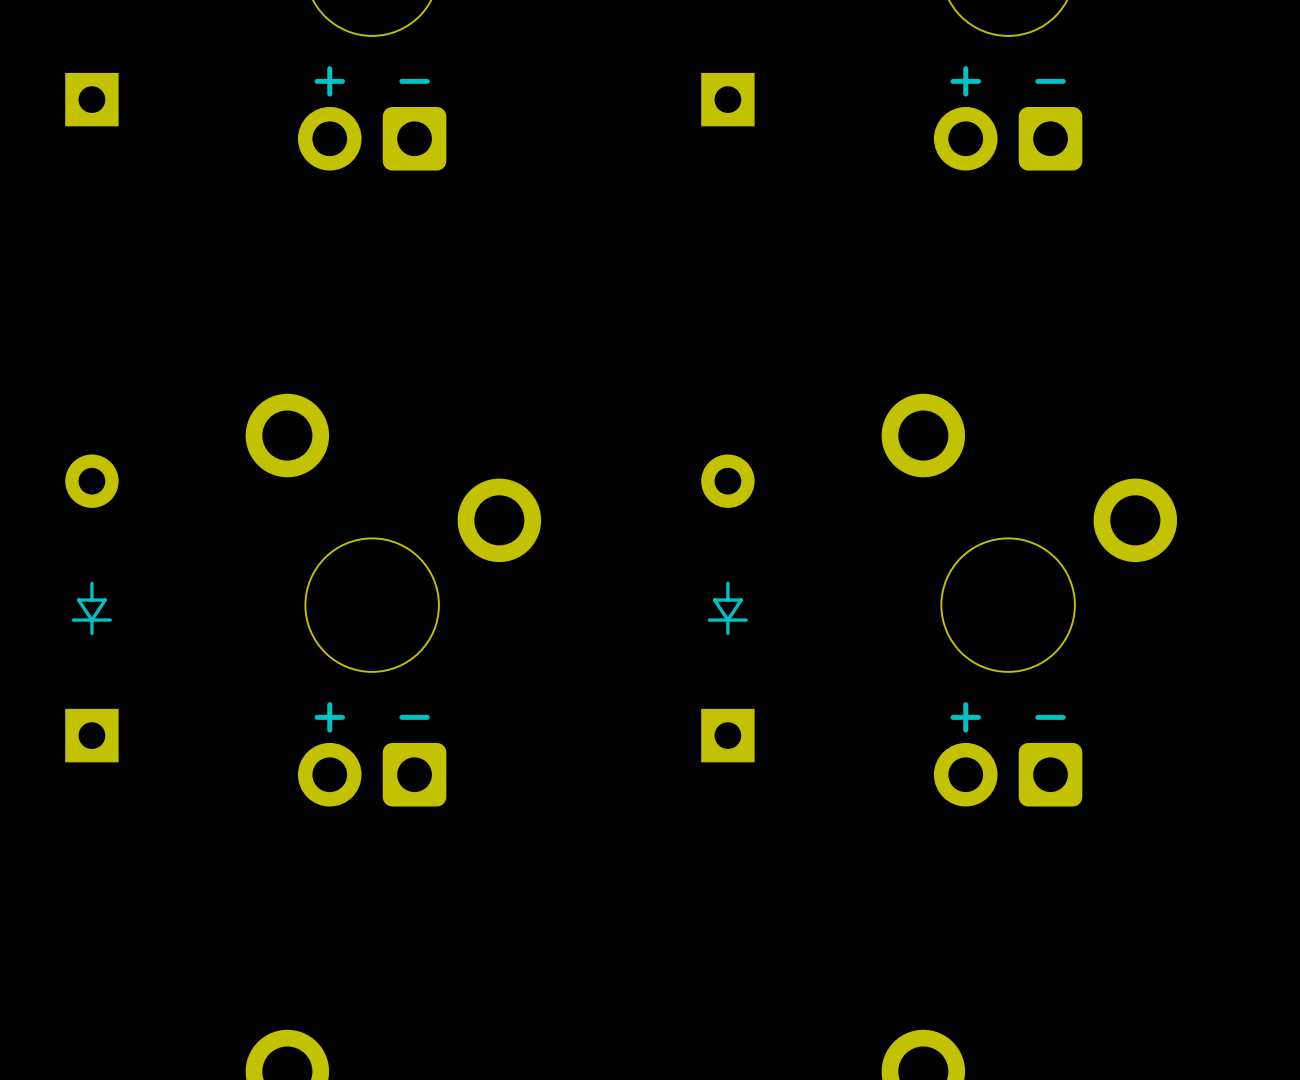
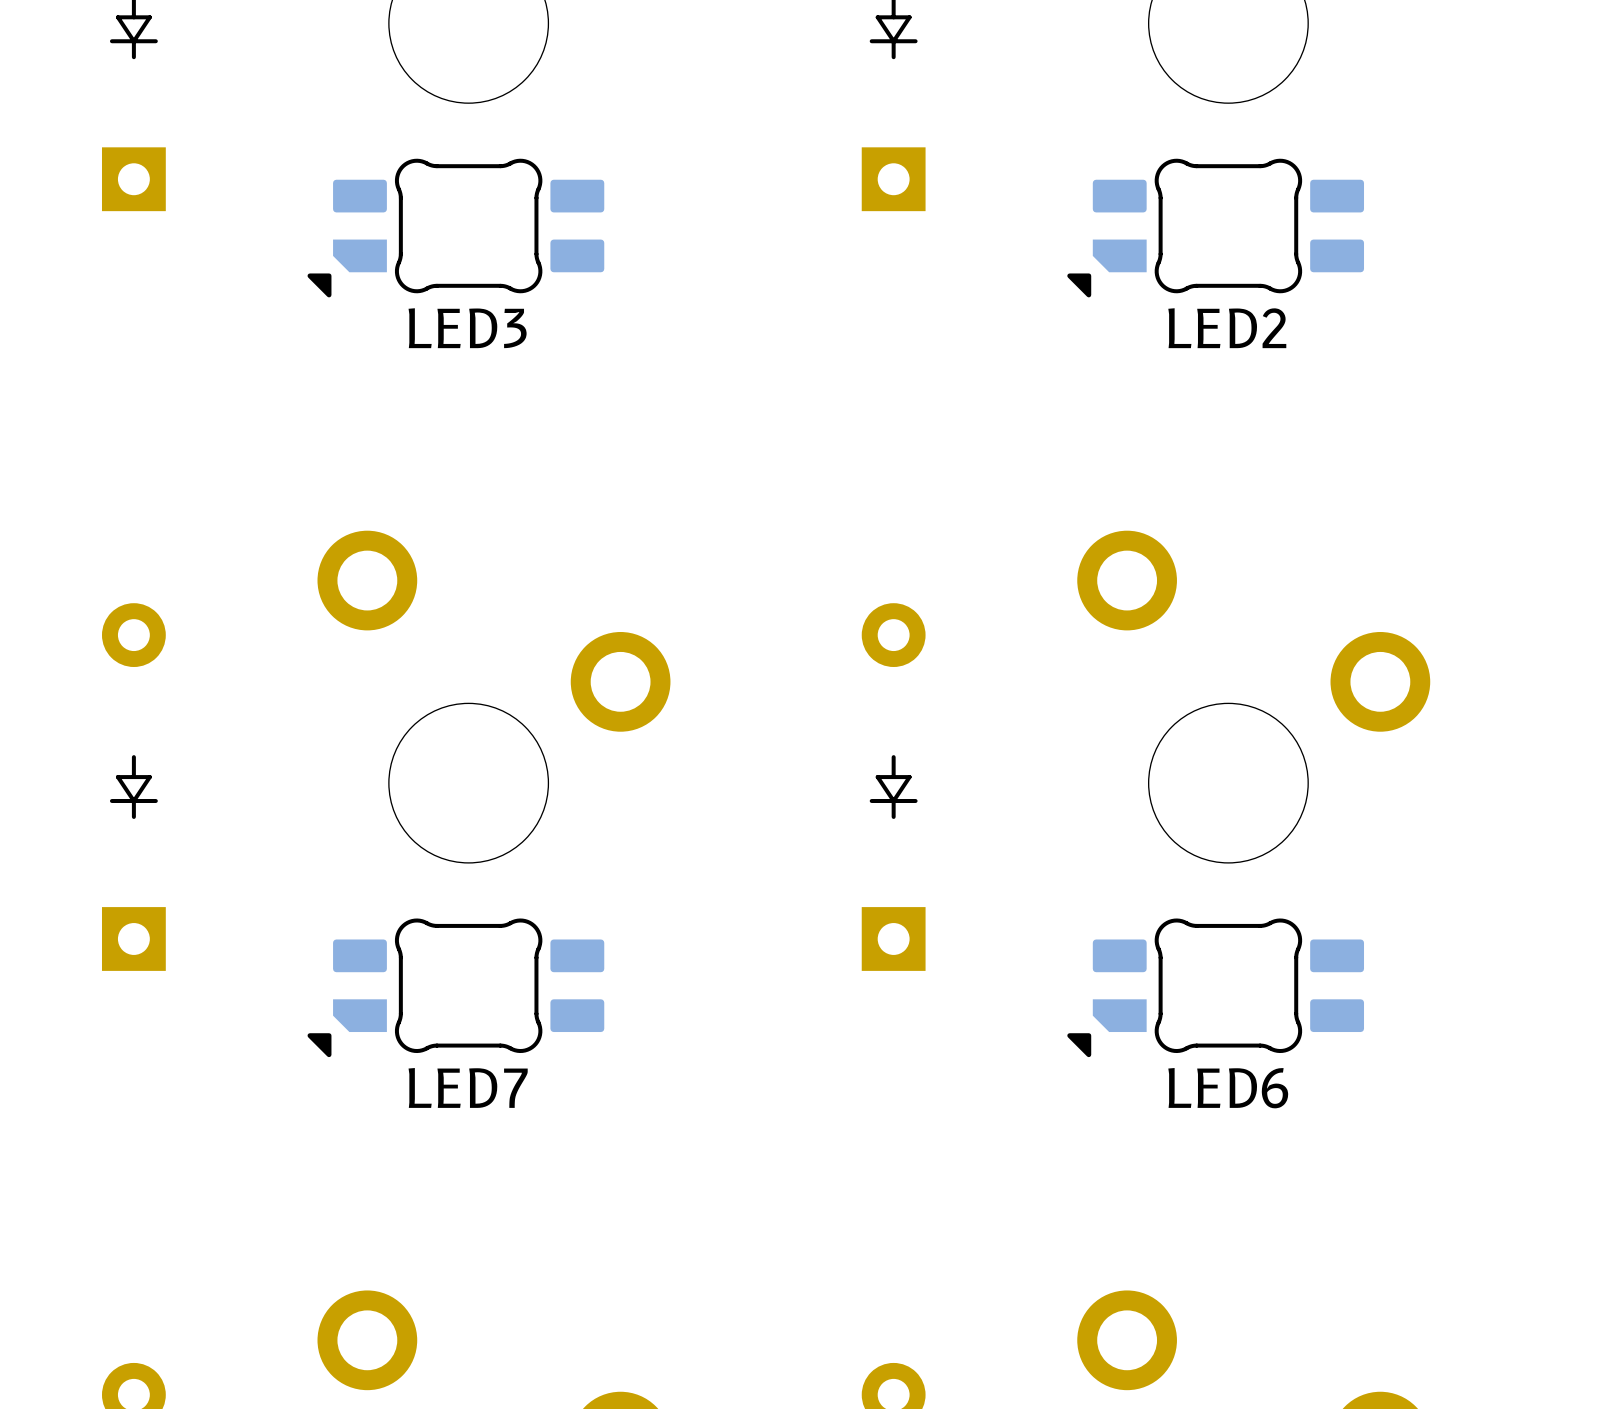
part: (372, 138) -> none
part: (1008, 138) -> none
LED3: none -> (455, 228)
LED2: none -> (1215, 228)
part: (372, 774) -> none
part: (1008, 774) -> none
LED7: none -> (455, 987)
LED6: none -> (1215, 987)

